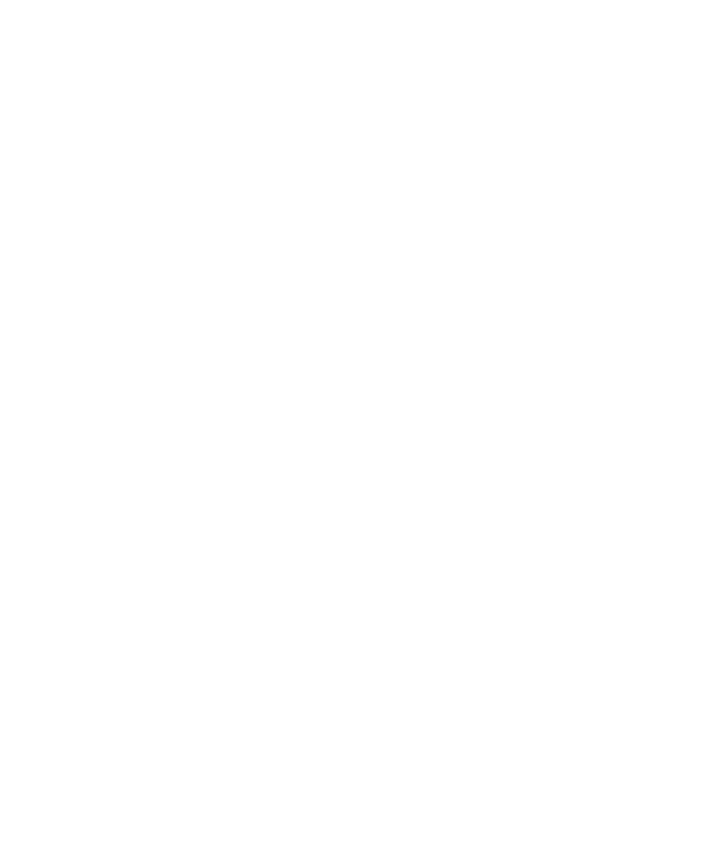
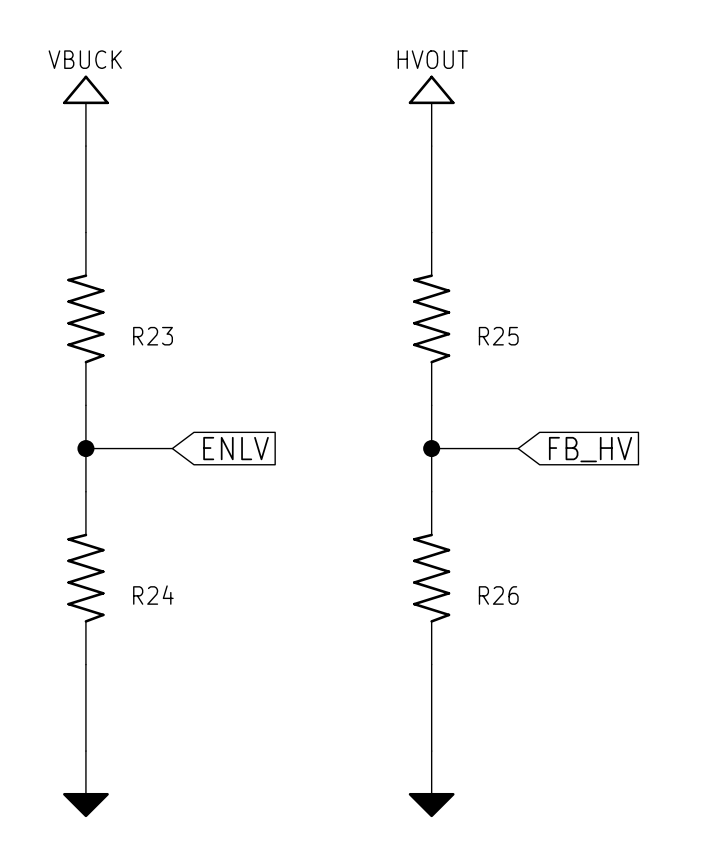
power symbol: none -> VBUCK (85, 110)
power symbol: none -> HVOUT (431, 110)
wire: none -> (85, 146) (85, 232)
wire: none -> (431, 146) (431, 232)
R23: none -> (85, 318)
R25: none -> (431, 318)
wire: none -> (85, 405) (85, 491)
wire: none -> (431, 405) (431, 491)
wire: none -> (85, 448) (172, 448)
junction: none -> (85, 448)
global label: none -> ENLV (236, 448)
wire: none -> (431, 448) (518, 448)
junction: none -> (431, 448)
global label: none -> FB_HV (590, 449)
R24: none -> (85, 578)
R26: none -> (431, 578)
wire: none -> (85, 664) (85, 751)
wire: none -> (431, 664) (431, 751)
power symbol: none -> (85, 784)
power symbol: none -> (431, 784)

